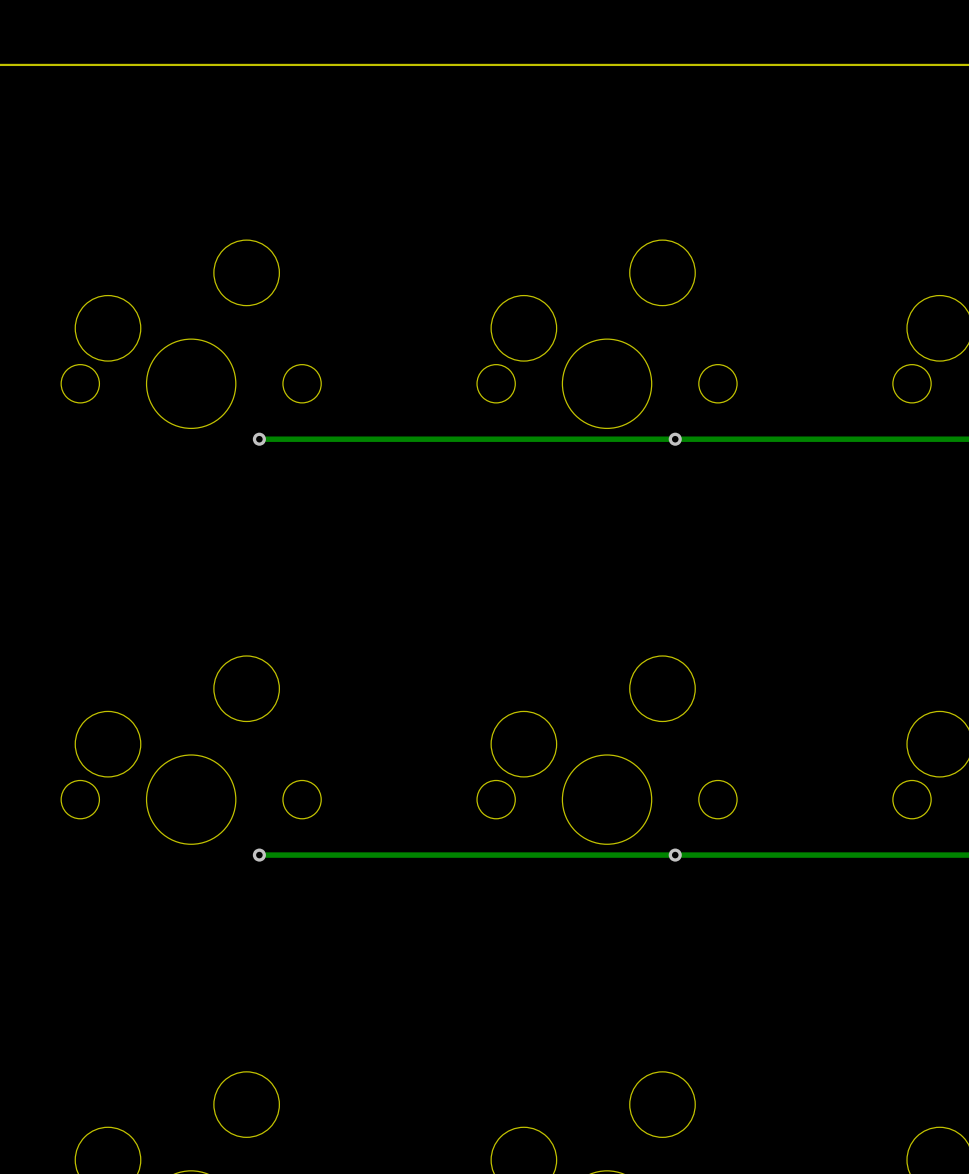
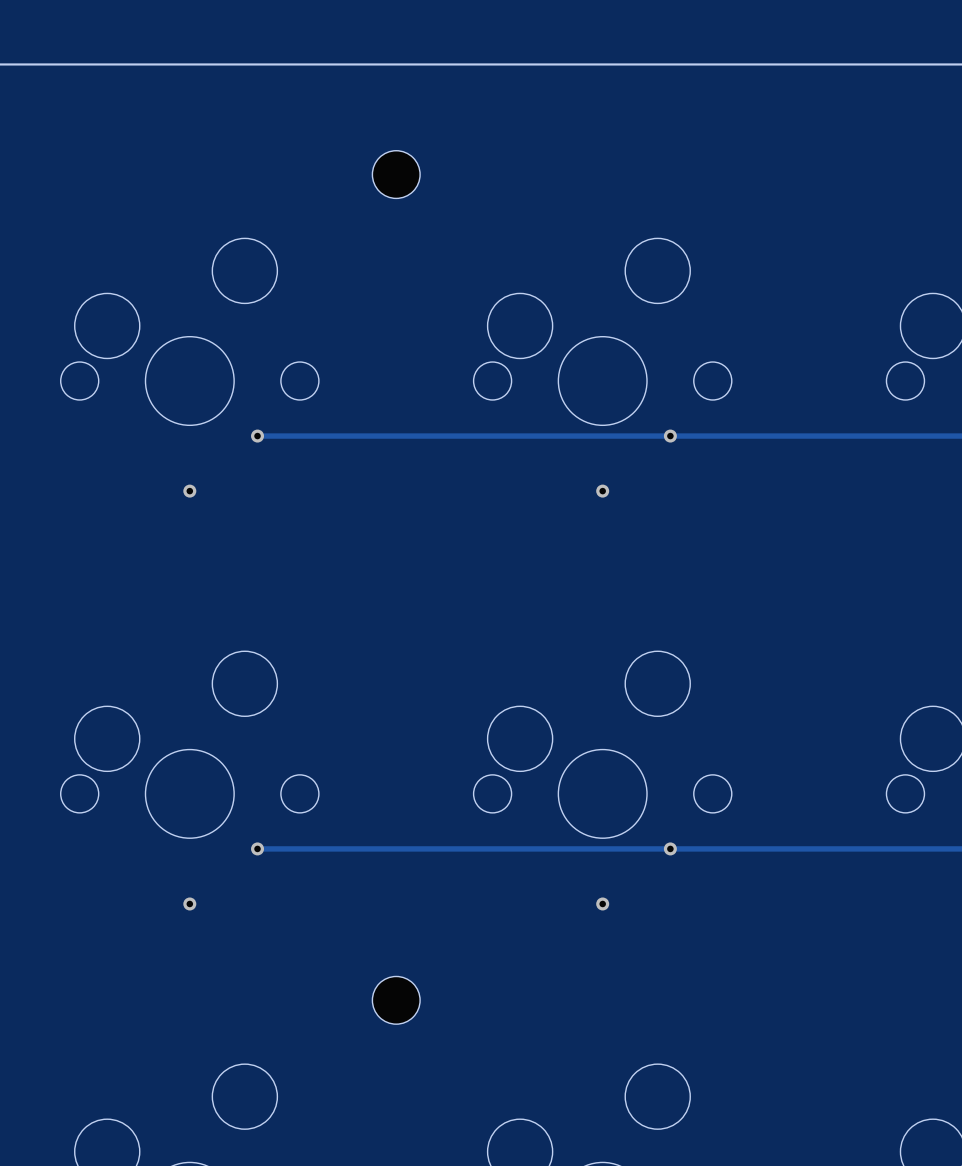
part: none -> (396, 174)
via: none -> (189, 491)
via: none -> (602, 491)
via: none -> (189, 903)
via: none -> (602, 903)
part: none -> (396, 1000)

